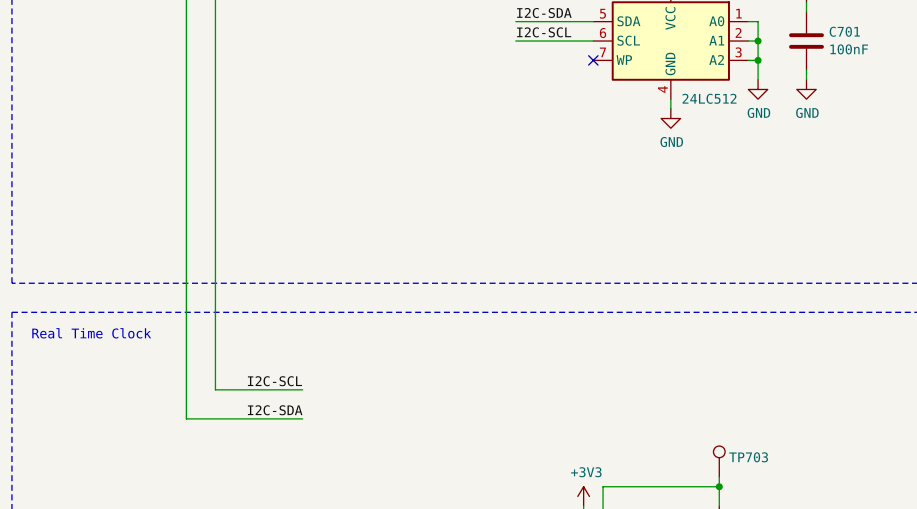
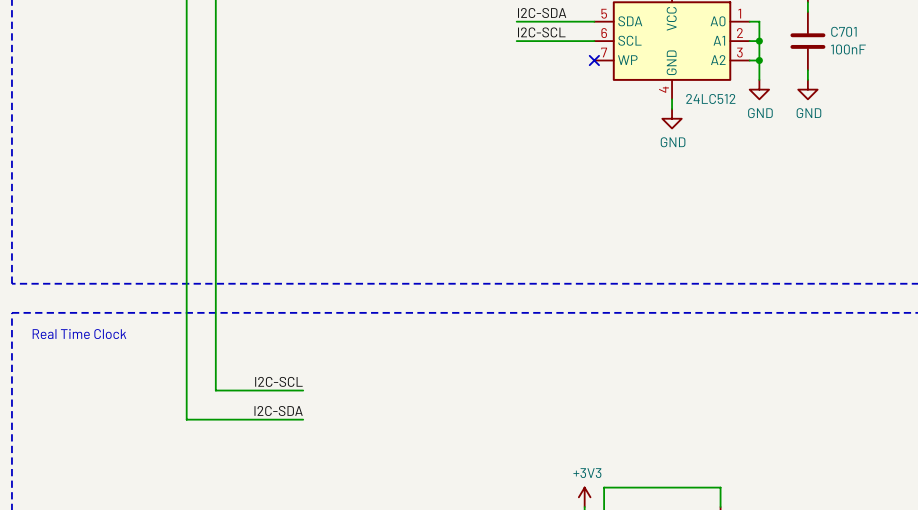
TP703: (719, 461) -> none
wire: (719, 477) (719, 486) -> none
junction: (719, 486) -> none

